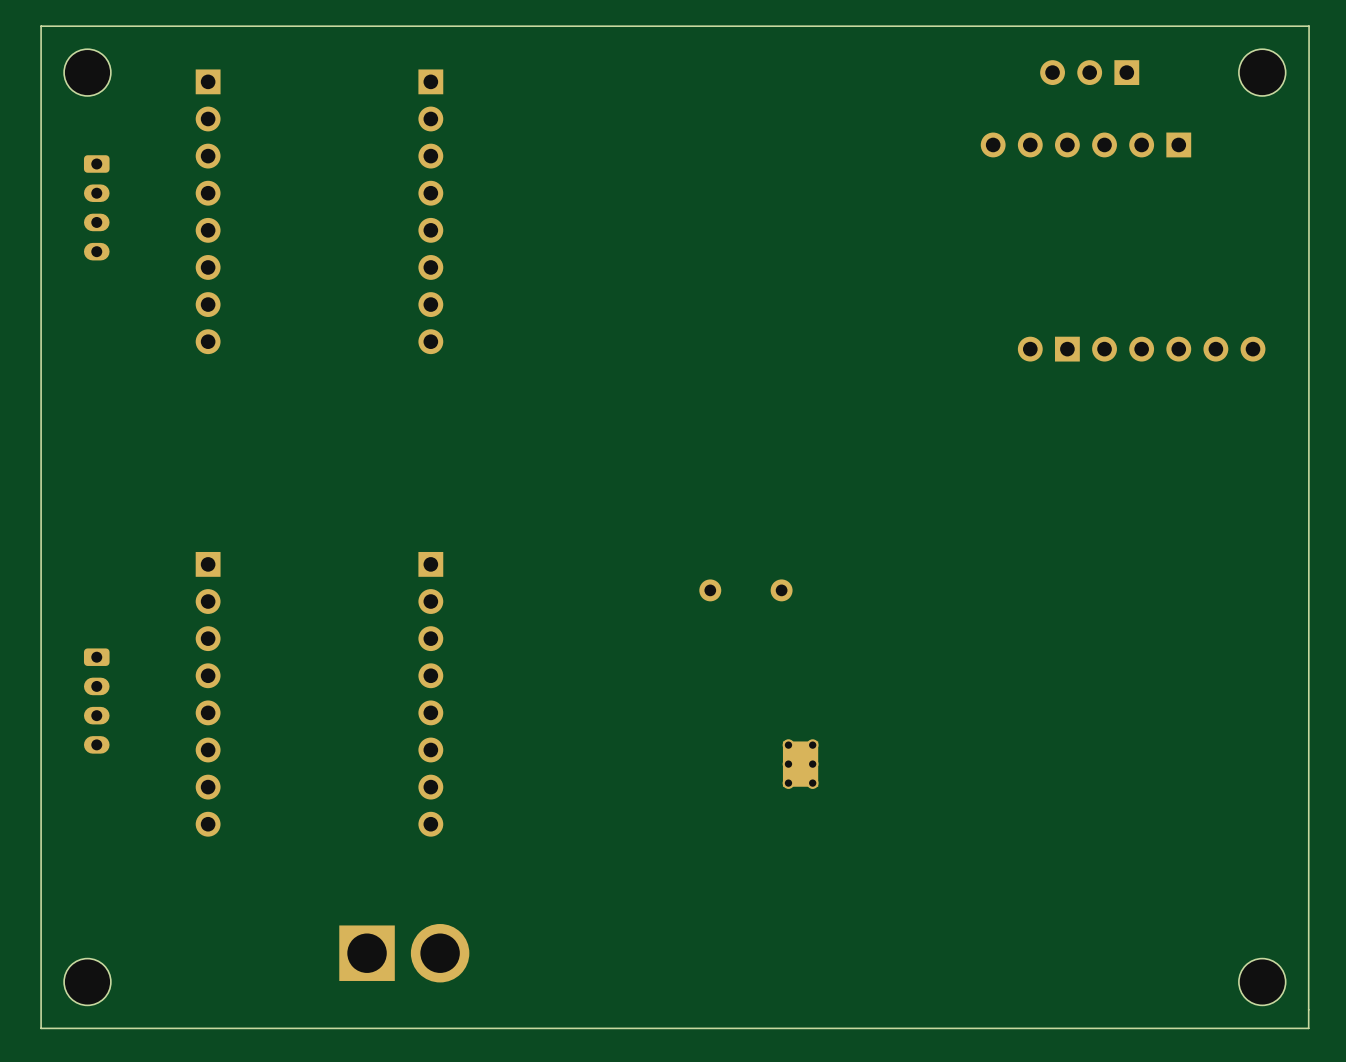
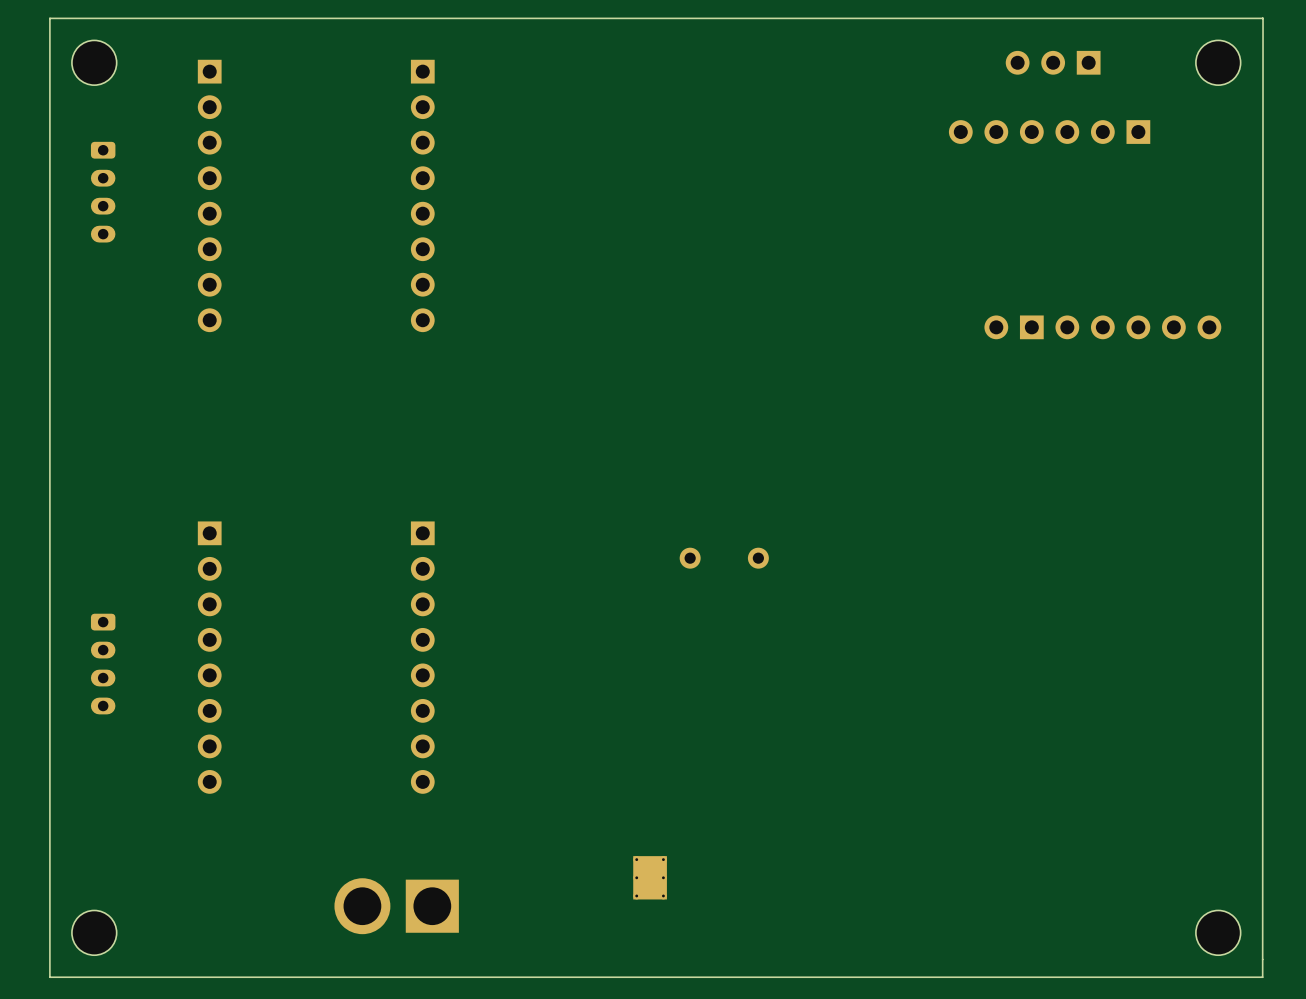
part: (800, 764) -> none
part: none -> (650, 877)
part rotation: 0° (404, 953) -> 180° (396, 906)

